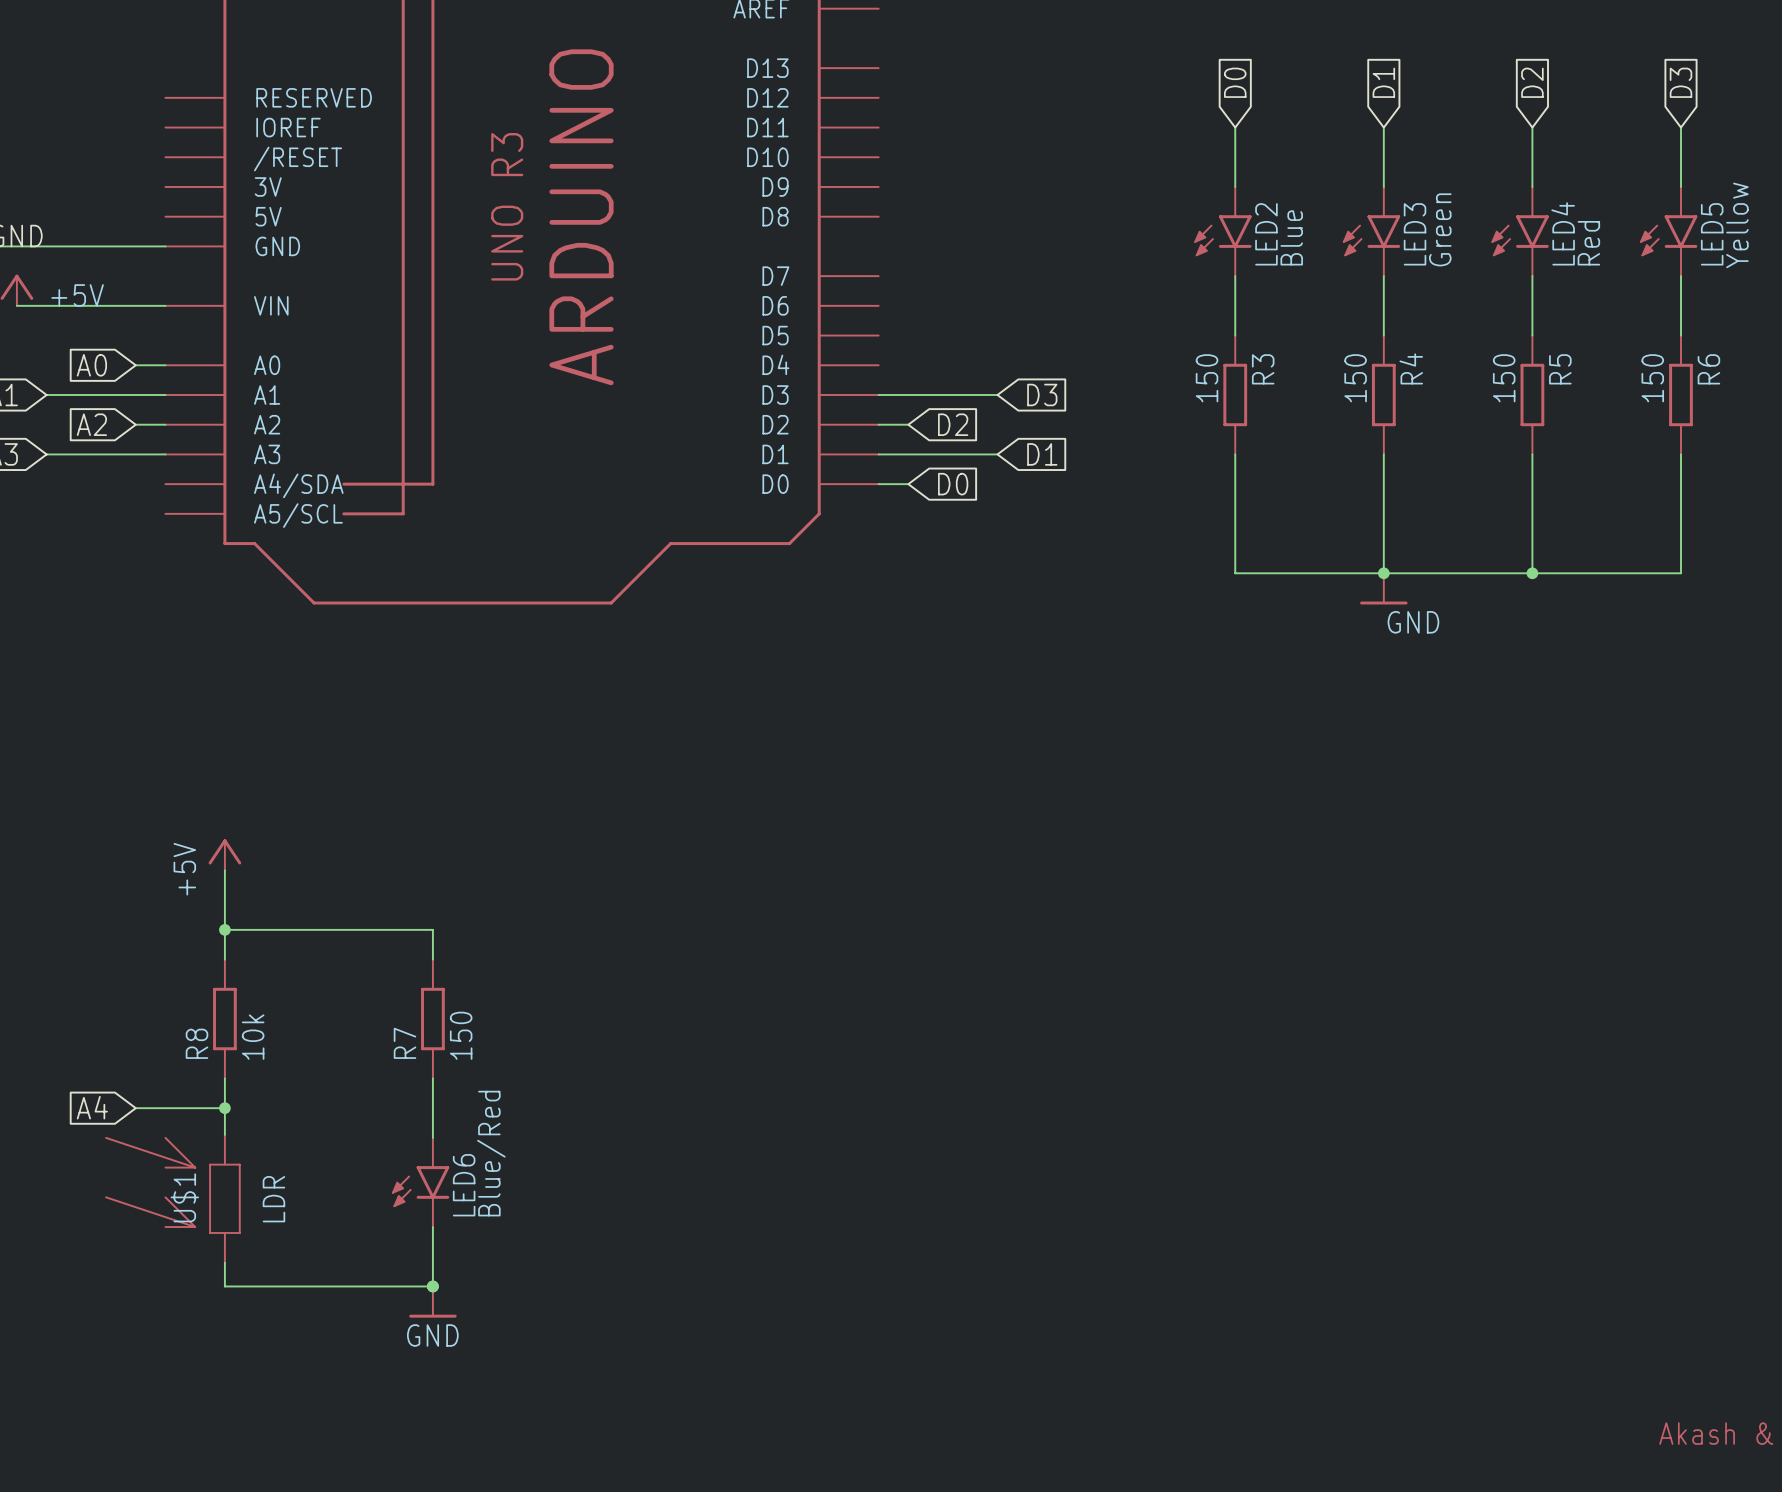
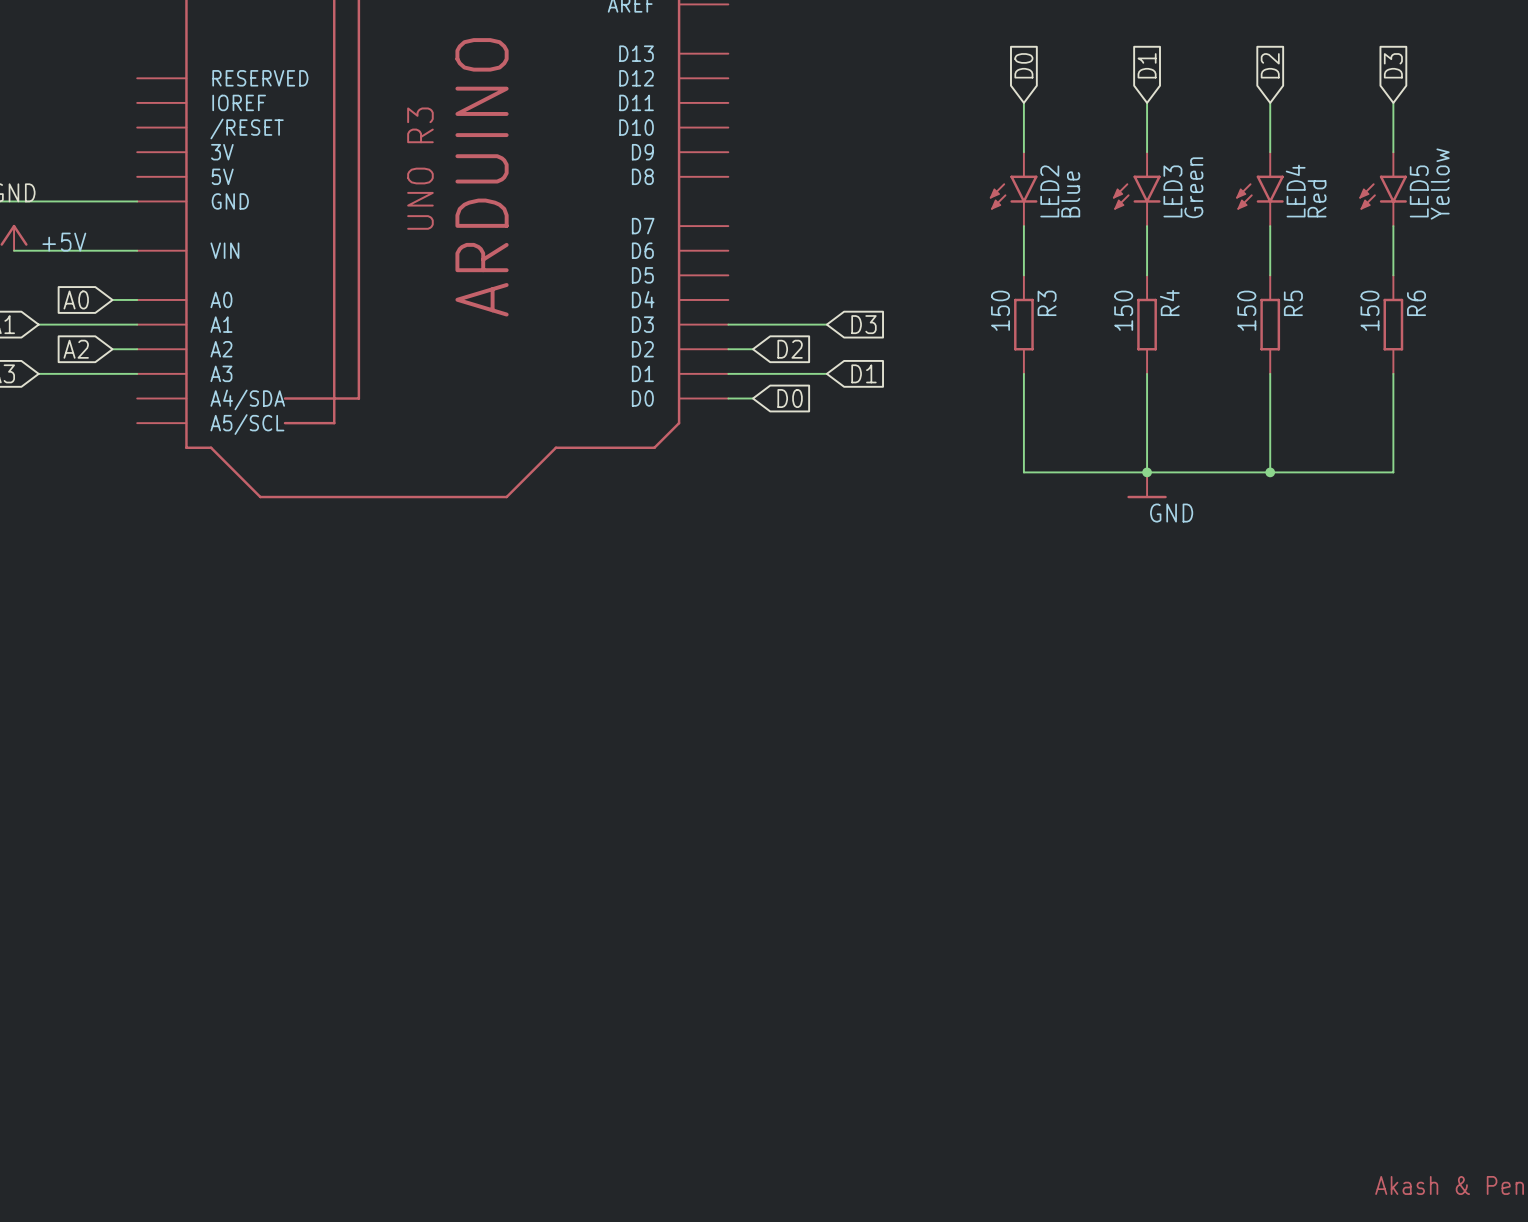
power symbol: +5V (224, 854) -> none
wire: (224, 870) (224, 959) -> none
wire: (224, 929) (432, 929) (432, 959) -> none
junction: (224, 929) -> none
R8: 10k (224, 1019) -> none
R7: 150 (432, 1019) -> none
wire: (224, 1078) (224, 1134) -> none
wire: (432, 1078) (432, 1137) -> none
global label: A4 (92, 1107) -> none
wire: (135, 1108) (224, 1108) -> none
junction: (224, 1108) -> none
LED6: Blue/Red (420, 1182) -> none
U$1: LDR (172, 1198) -> none
wire: (432, 1227) (432, 1286) (224, 1286) (224, 1262) -> none
junction: (432, 1286) -> none
power symbol: GND (432, 1302) -> none

